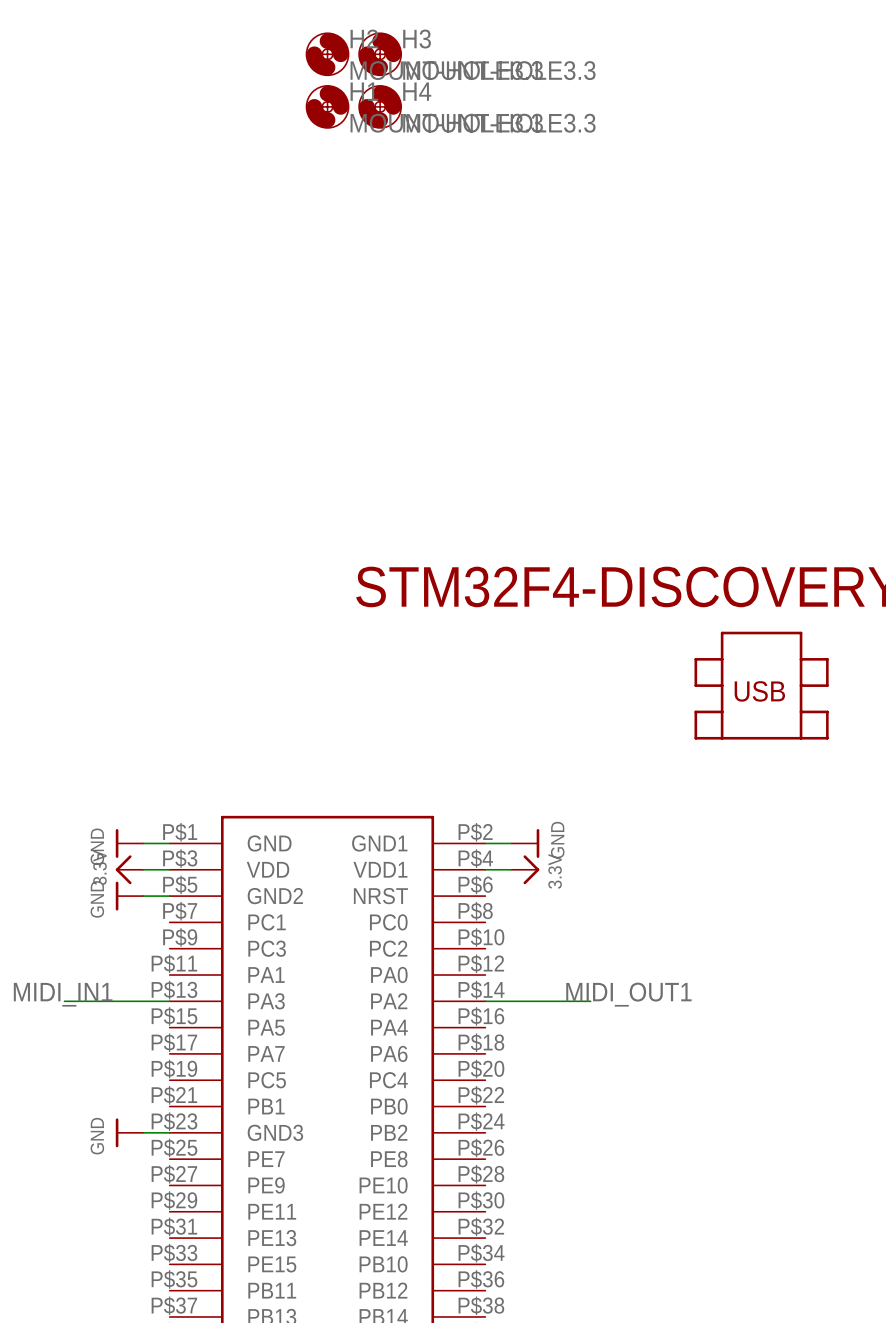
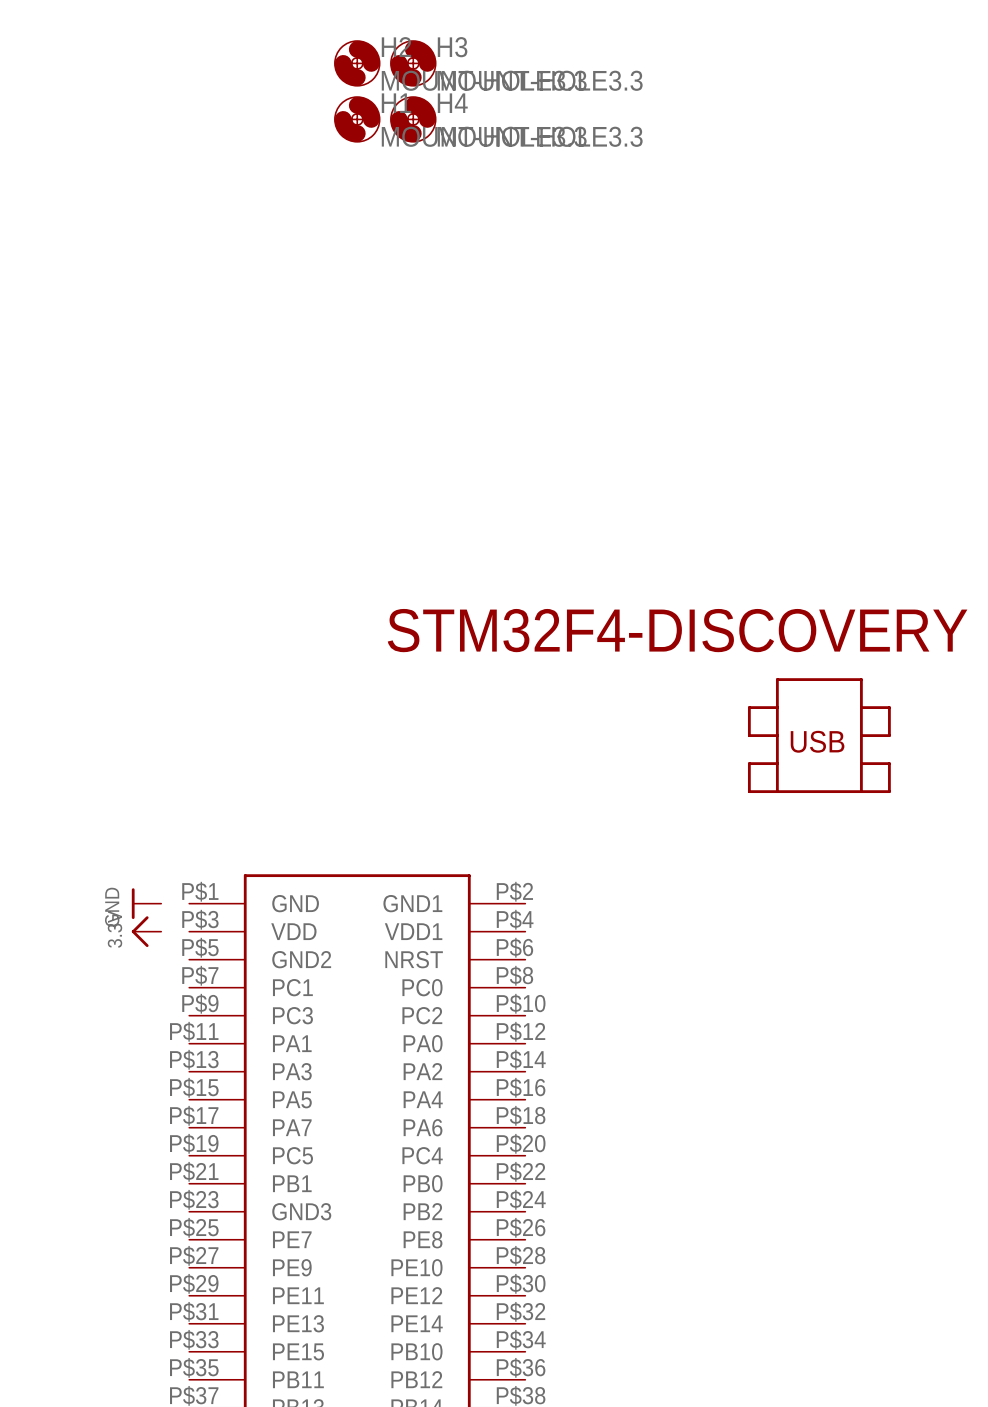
wire: (143, 843) (169, 843) -> none
wire: (485, 843) (511, 843) -> none
power symbol: GND (525, 843) -> none
wire: (143, 869) (169, 869) -> none
wire: (485, 869) (511, 869) -> none
power symbol: 3.3V (525, 869) -> none
power symbol: GND (129, 896) -> none
wire: (143, 896) (169, 896) -> none
label: MIDI_IN1 (63, 994) -> none
label: MIDI_OUT1 (628, 994) -> none
wire: (64, 1001) (169, 1001) -> none
wire: (485, 1001) (590, 1001) -> none
power symbol: GND (129, 1132) -> none
wire: (143, 1132) (169, 1132) -> none

